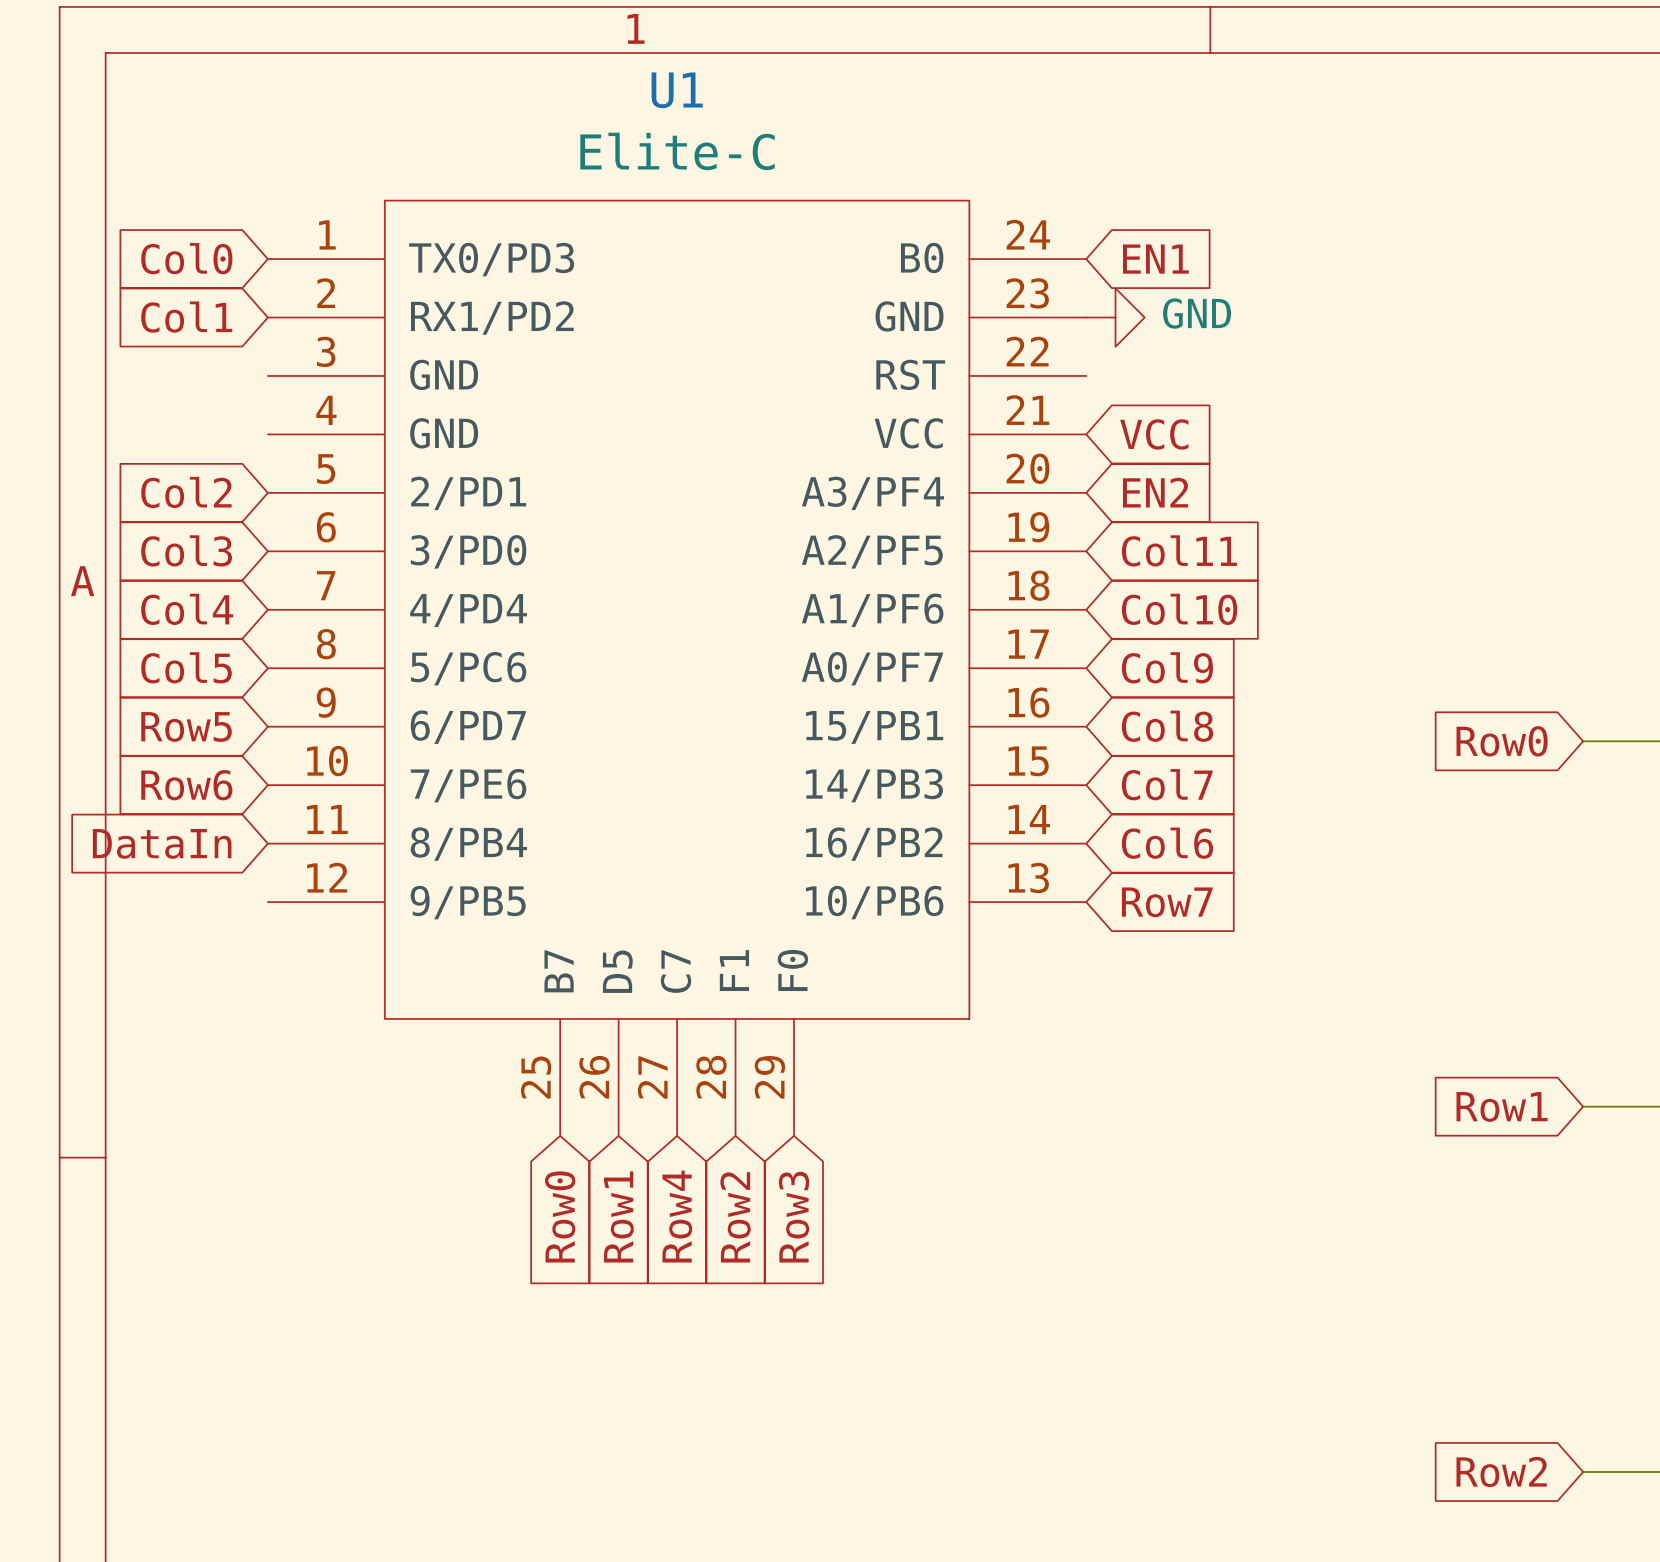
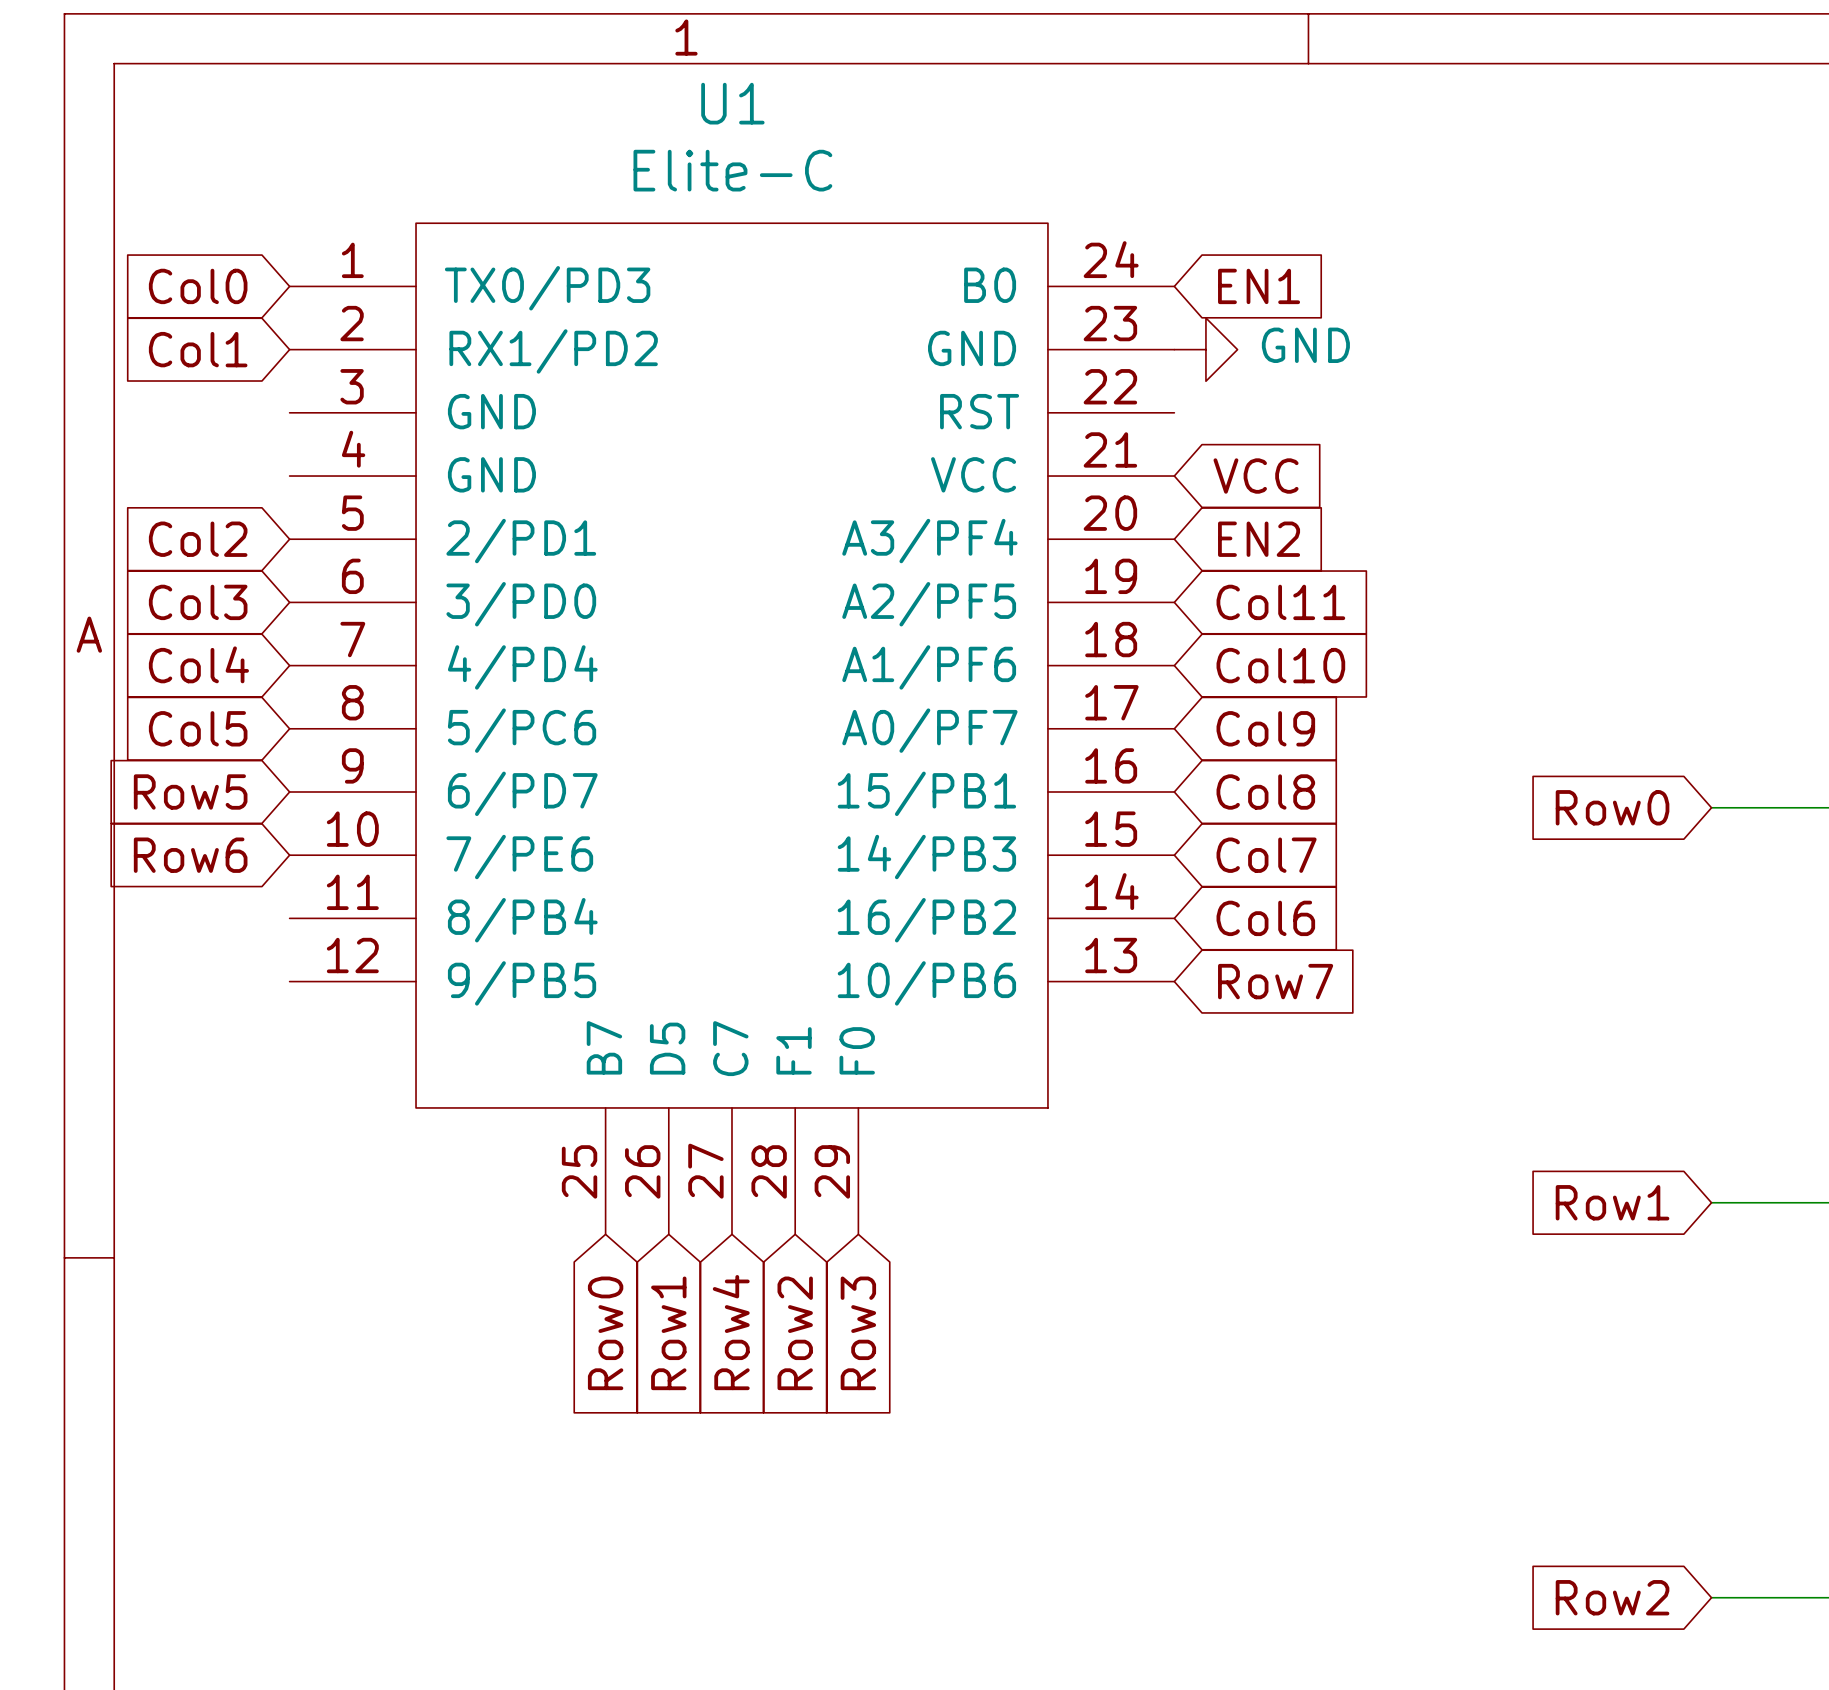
global label: DataIn (162, 843) -> none

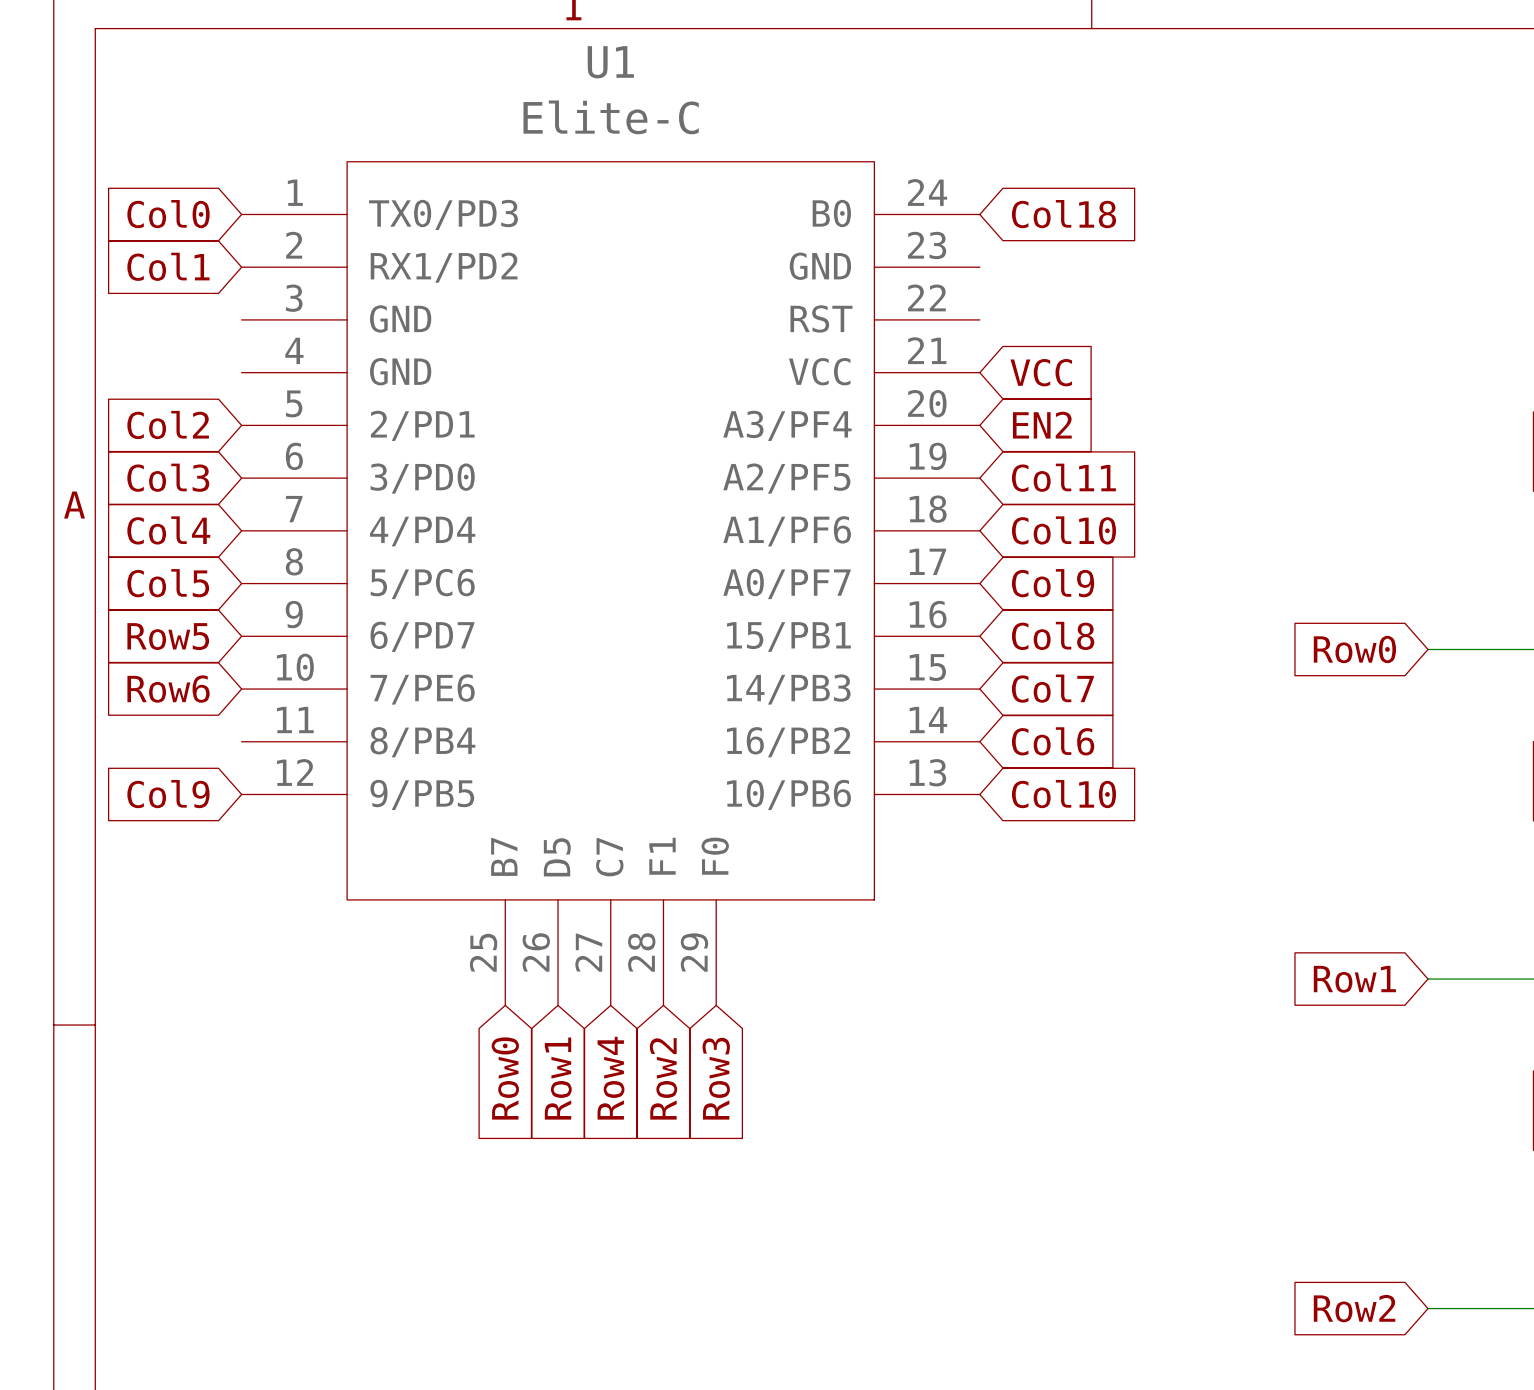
global label: EN1 (1259, 286) -> Col18 (1063, 214)
power symbol: GND (1205, 349) -> none
global label: none -> Col9 (168, 794)
global label: Row7 (1275, 981) -> Col10 (1063, 794)

